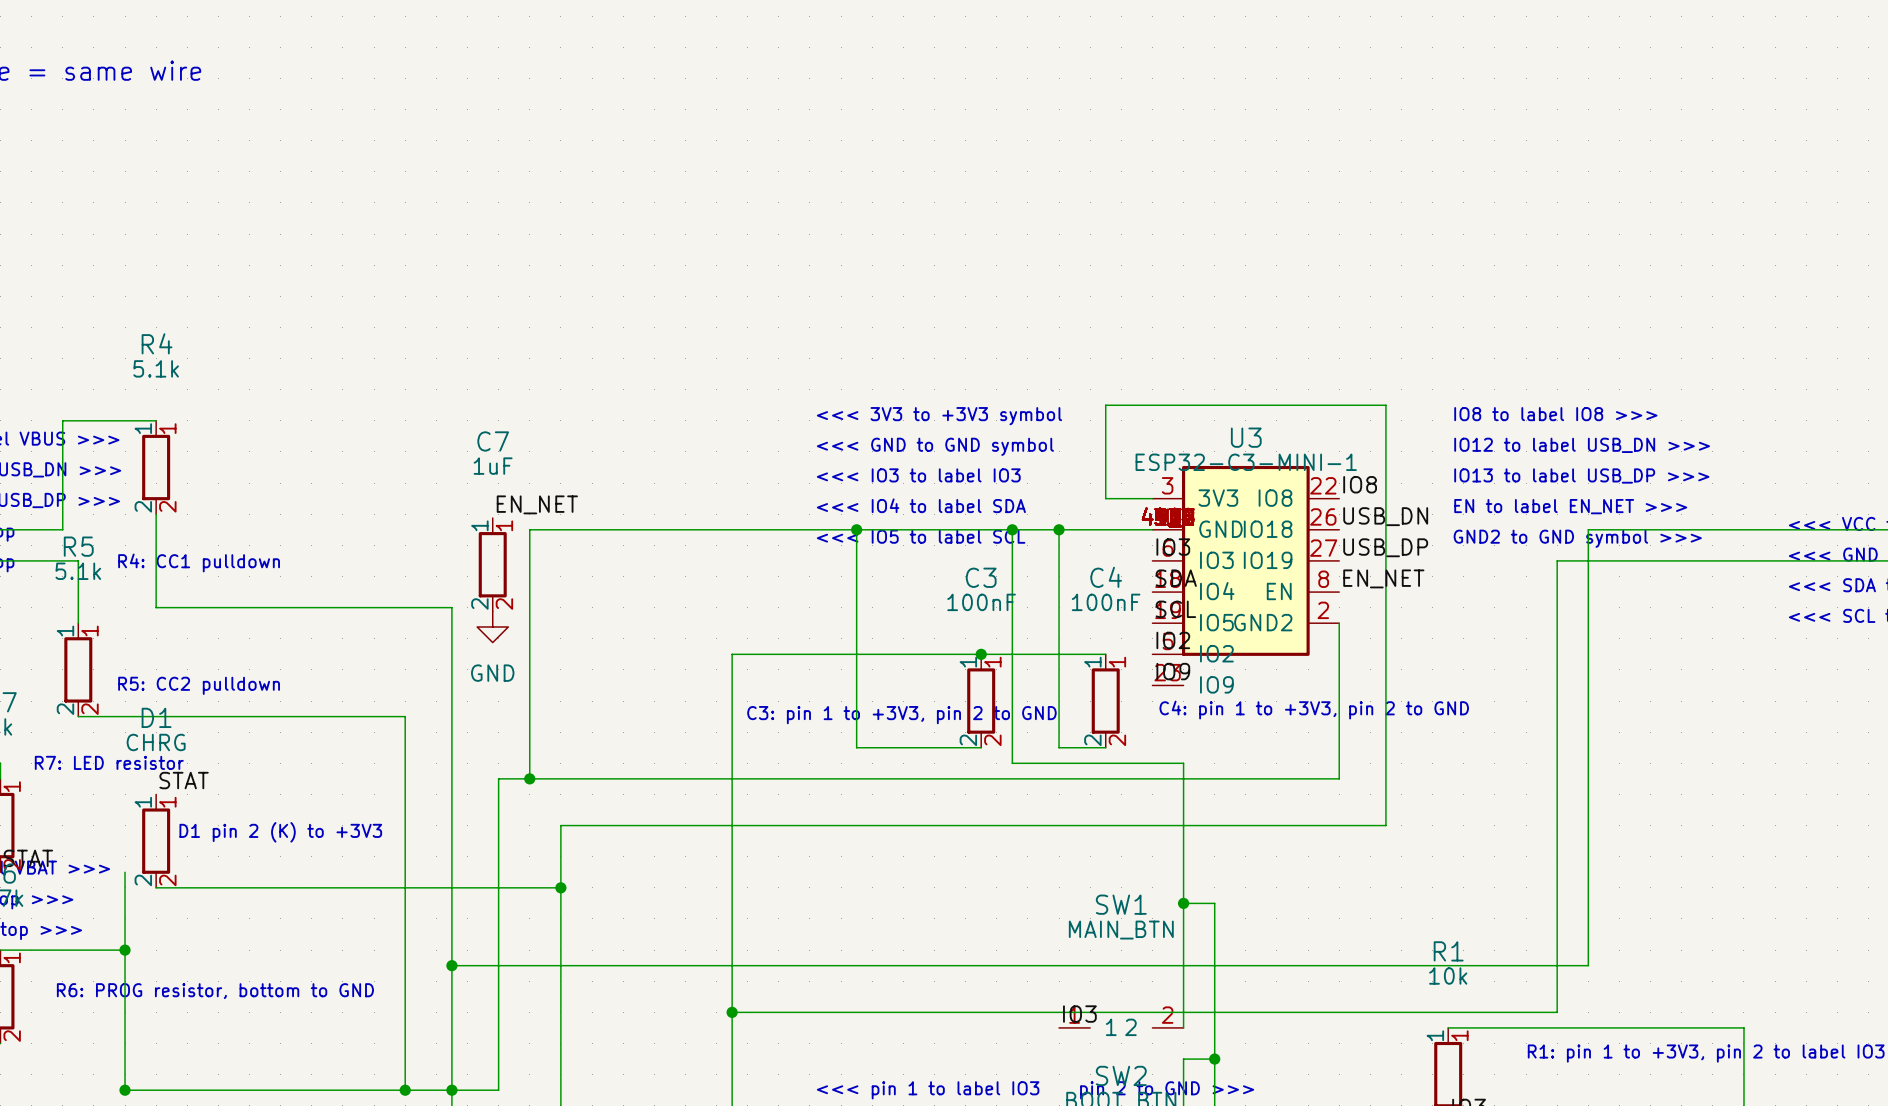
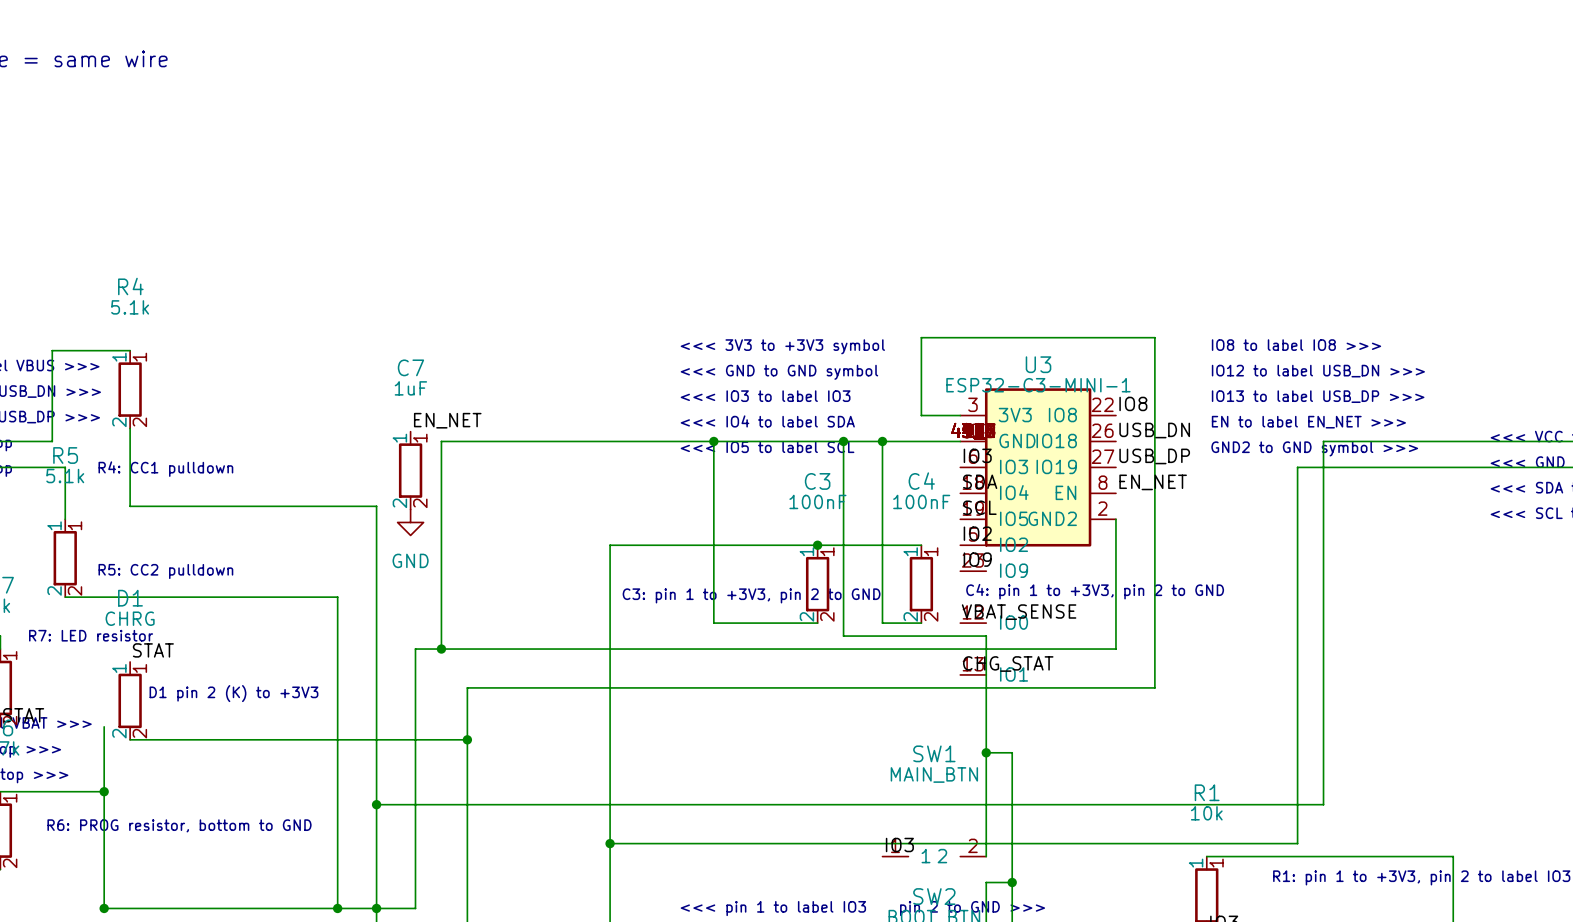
U3 symbol: [1152, 465, 1340, 686] -> [960, 388, 1116, 675]
label: none -> VBAT_SENSE (1019, 612)
label: none -> CHG_STAT (1008, 664)

